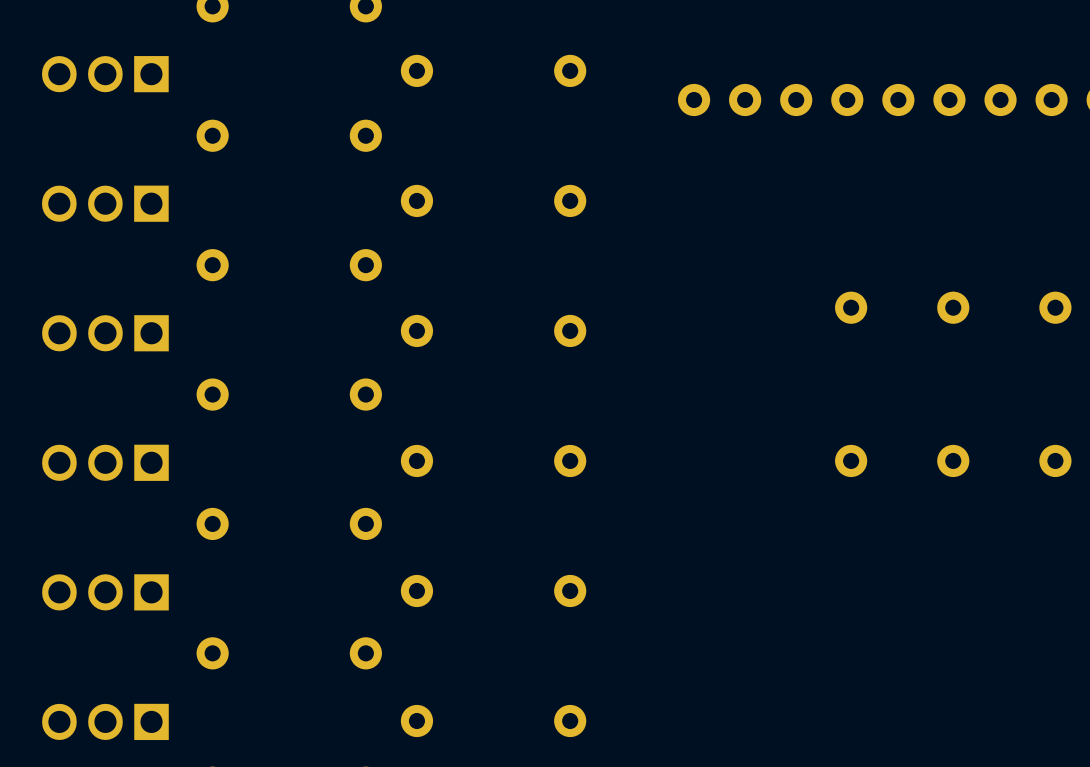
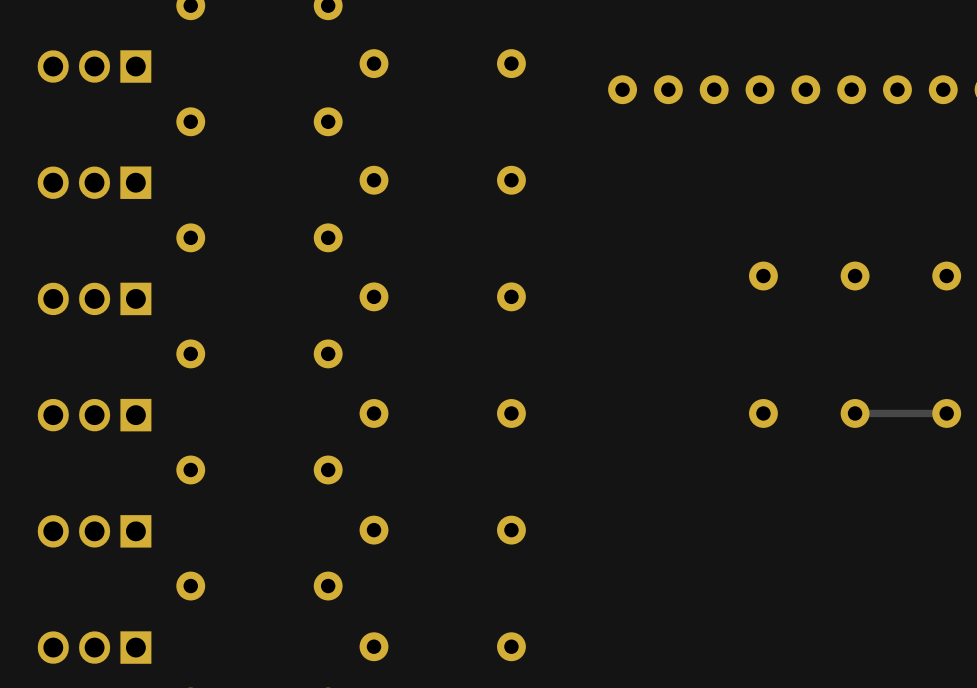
track: none -> (946, 413) (855, 413)

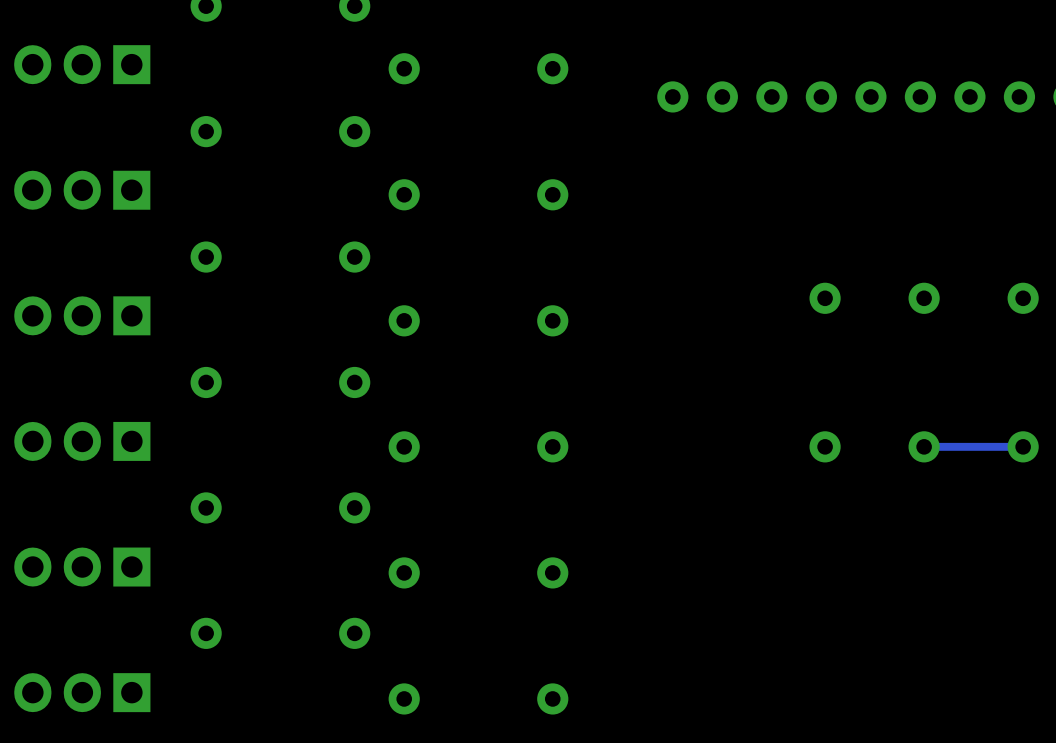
part: none -> (82, 64)
part: (94, 66) -> none
part: none -> (82, 190)
part: (94, 182) -> none
part: none -> (82, 315)
part: (94, 298) -> none
part: none -> (82, 441)
part: (94, 415) -> none
part: none -> (82, 567)
part: (94, 531) -> none
part: none -> (82, 692)
part: (94, 647) -> none

